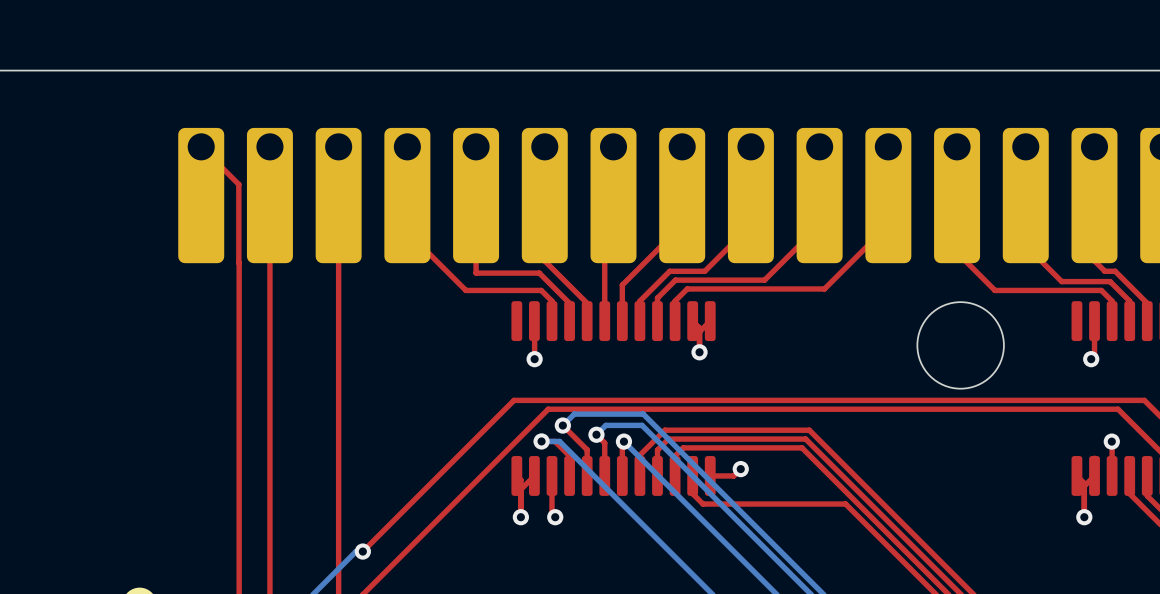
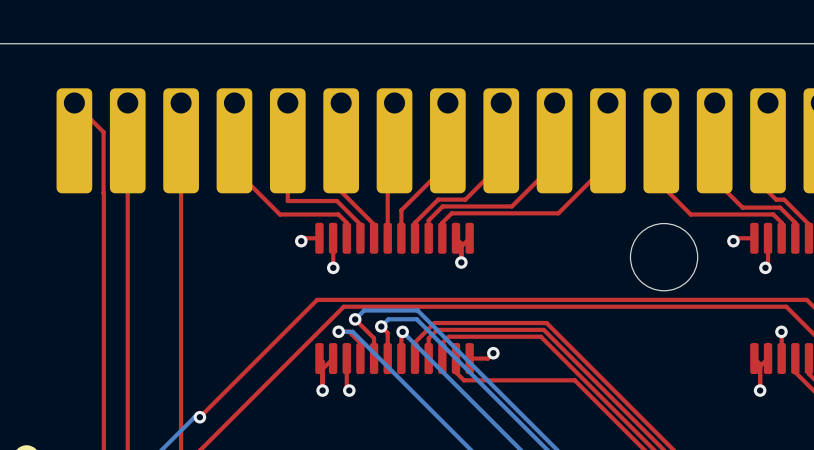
top track: none -> (319, 238) (304, 238) (301, 241)
top track: none -> (754, 238) (736, 238) (733, 241)
via: none -> (301, 241)
via: none -> (733, 241)

